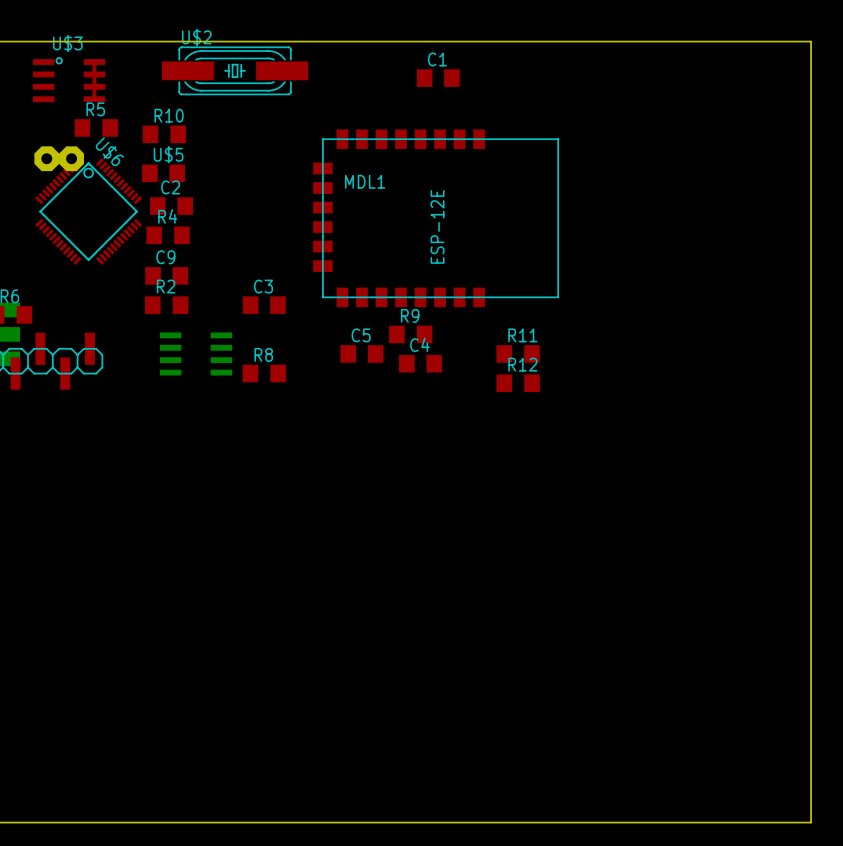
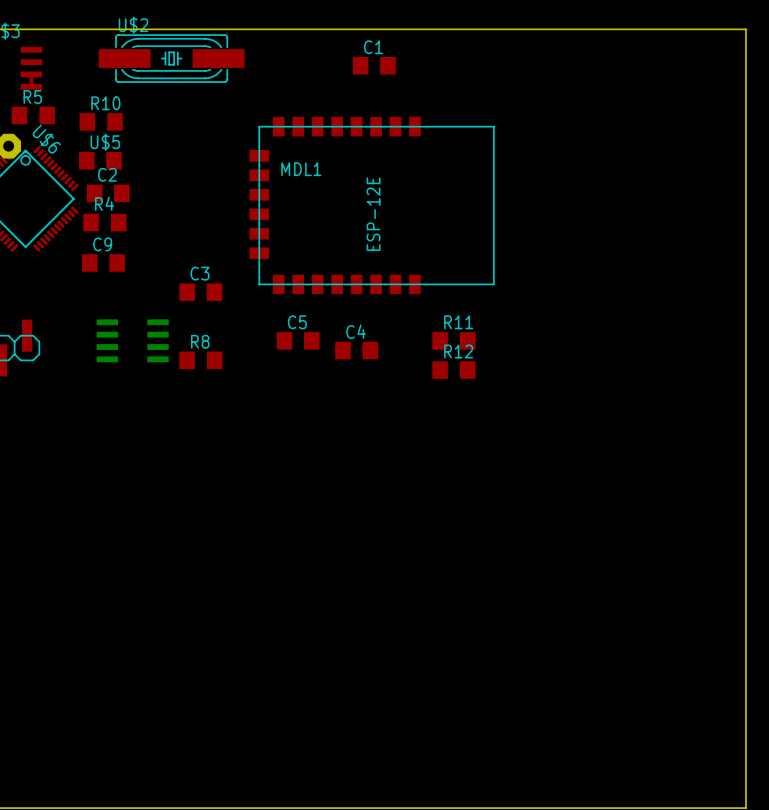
top track: (94, 62) (94, 86) -> none
R2: (166, 305) -> none
R9: (410, 334) -> none

